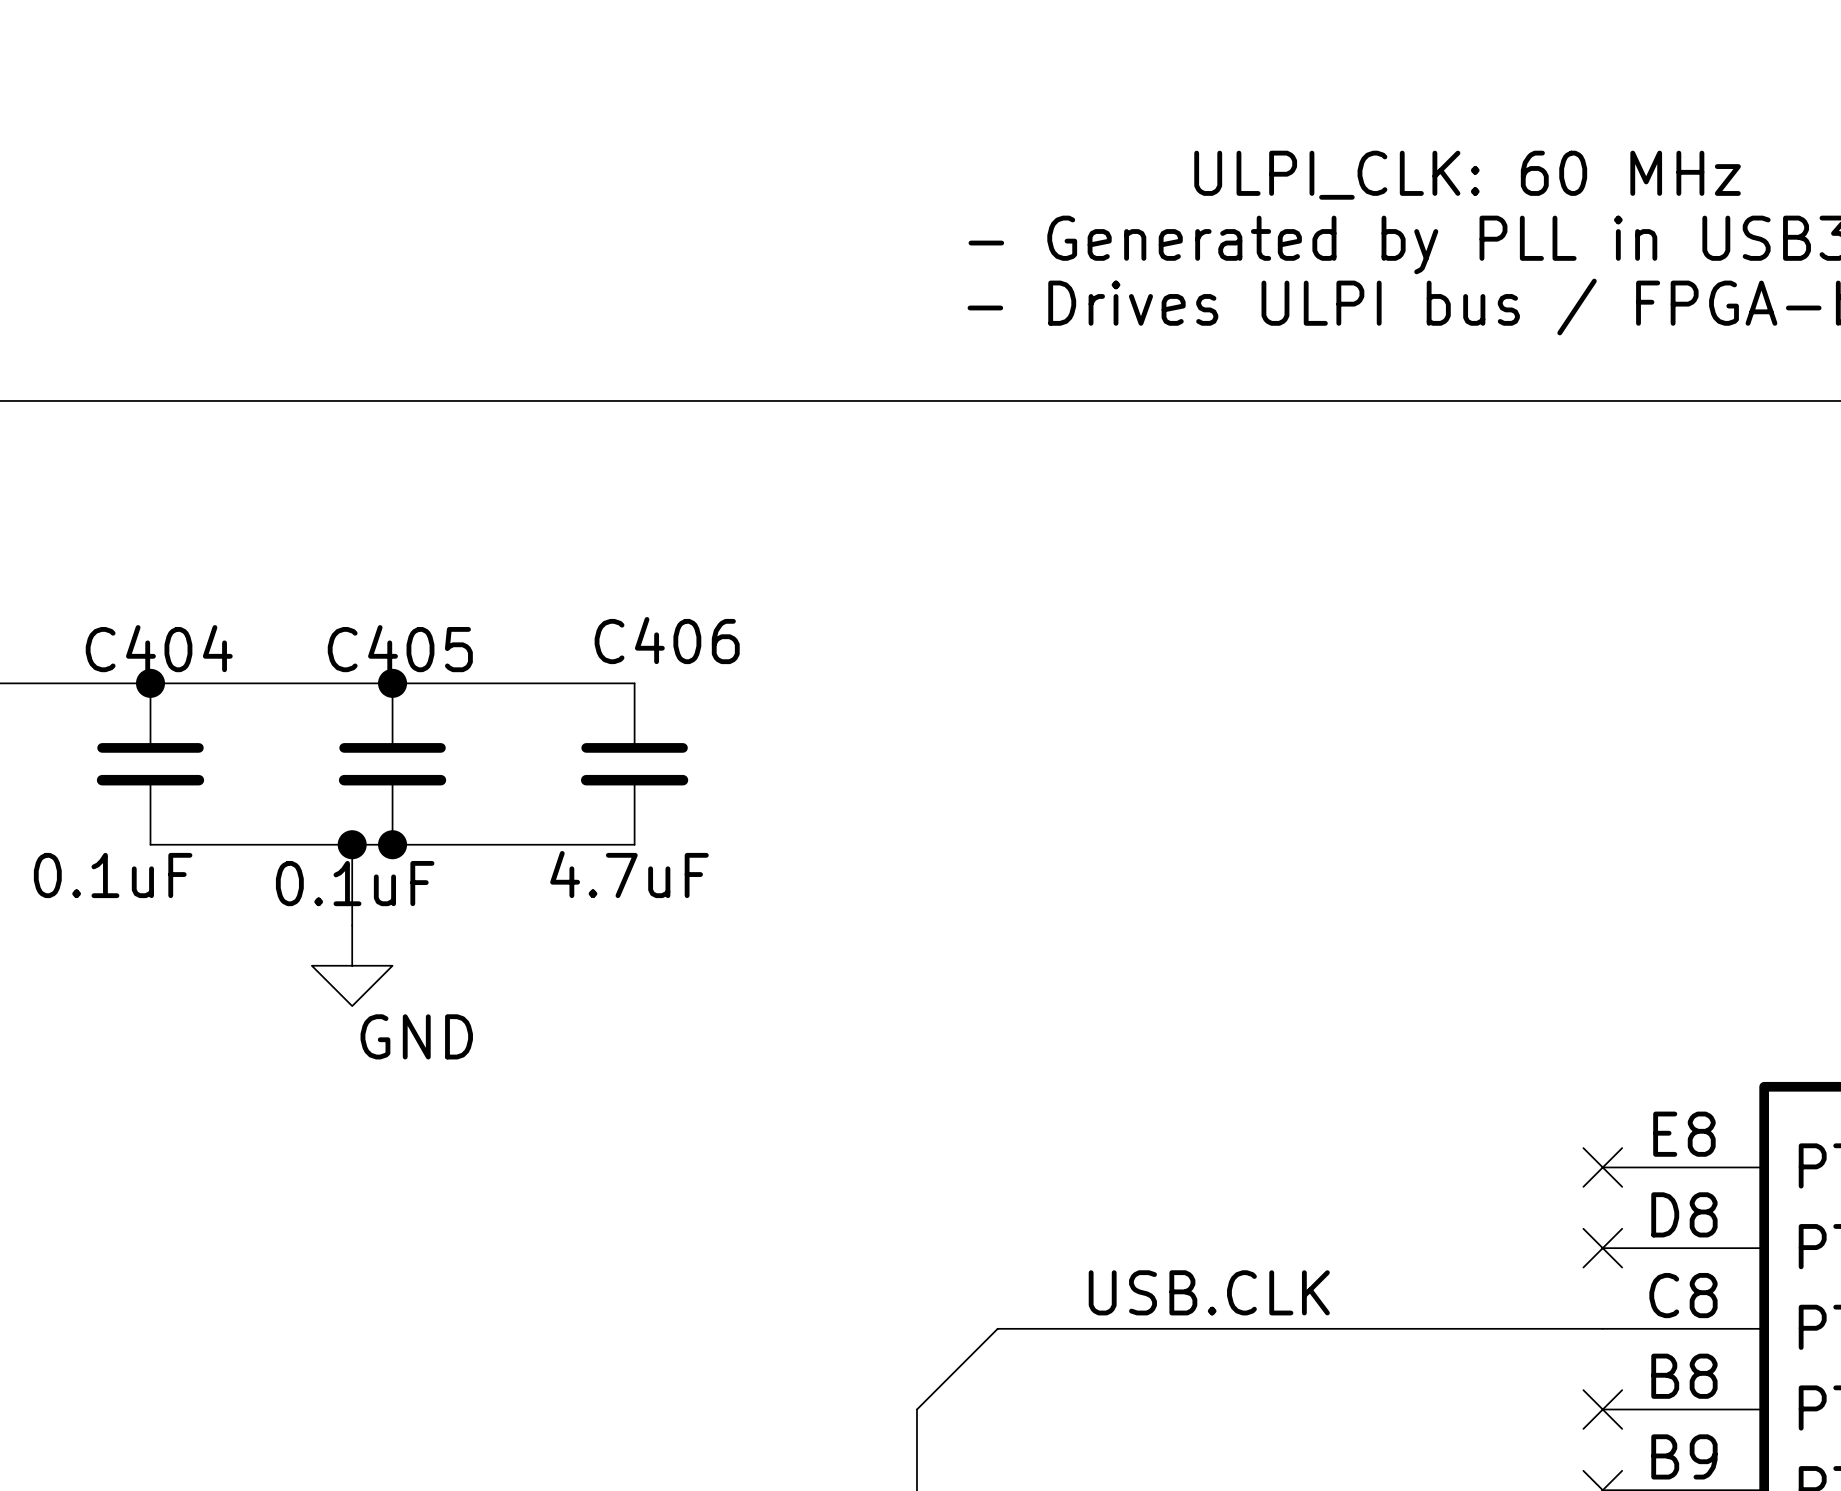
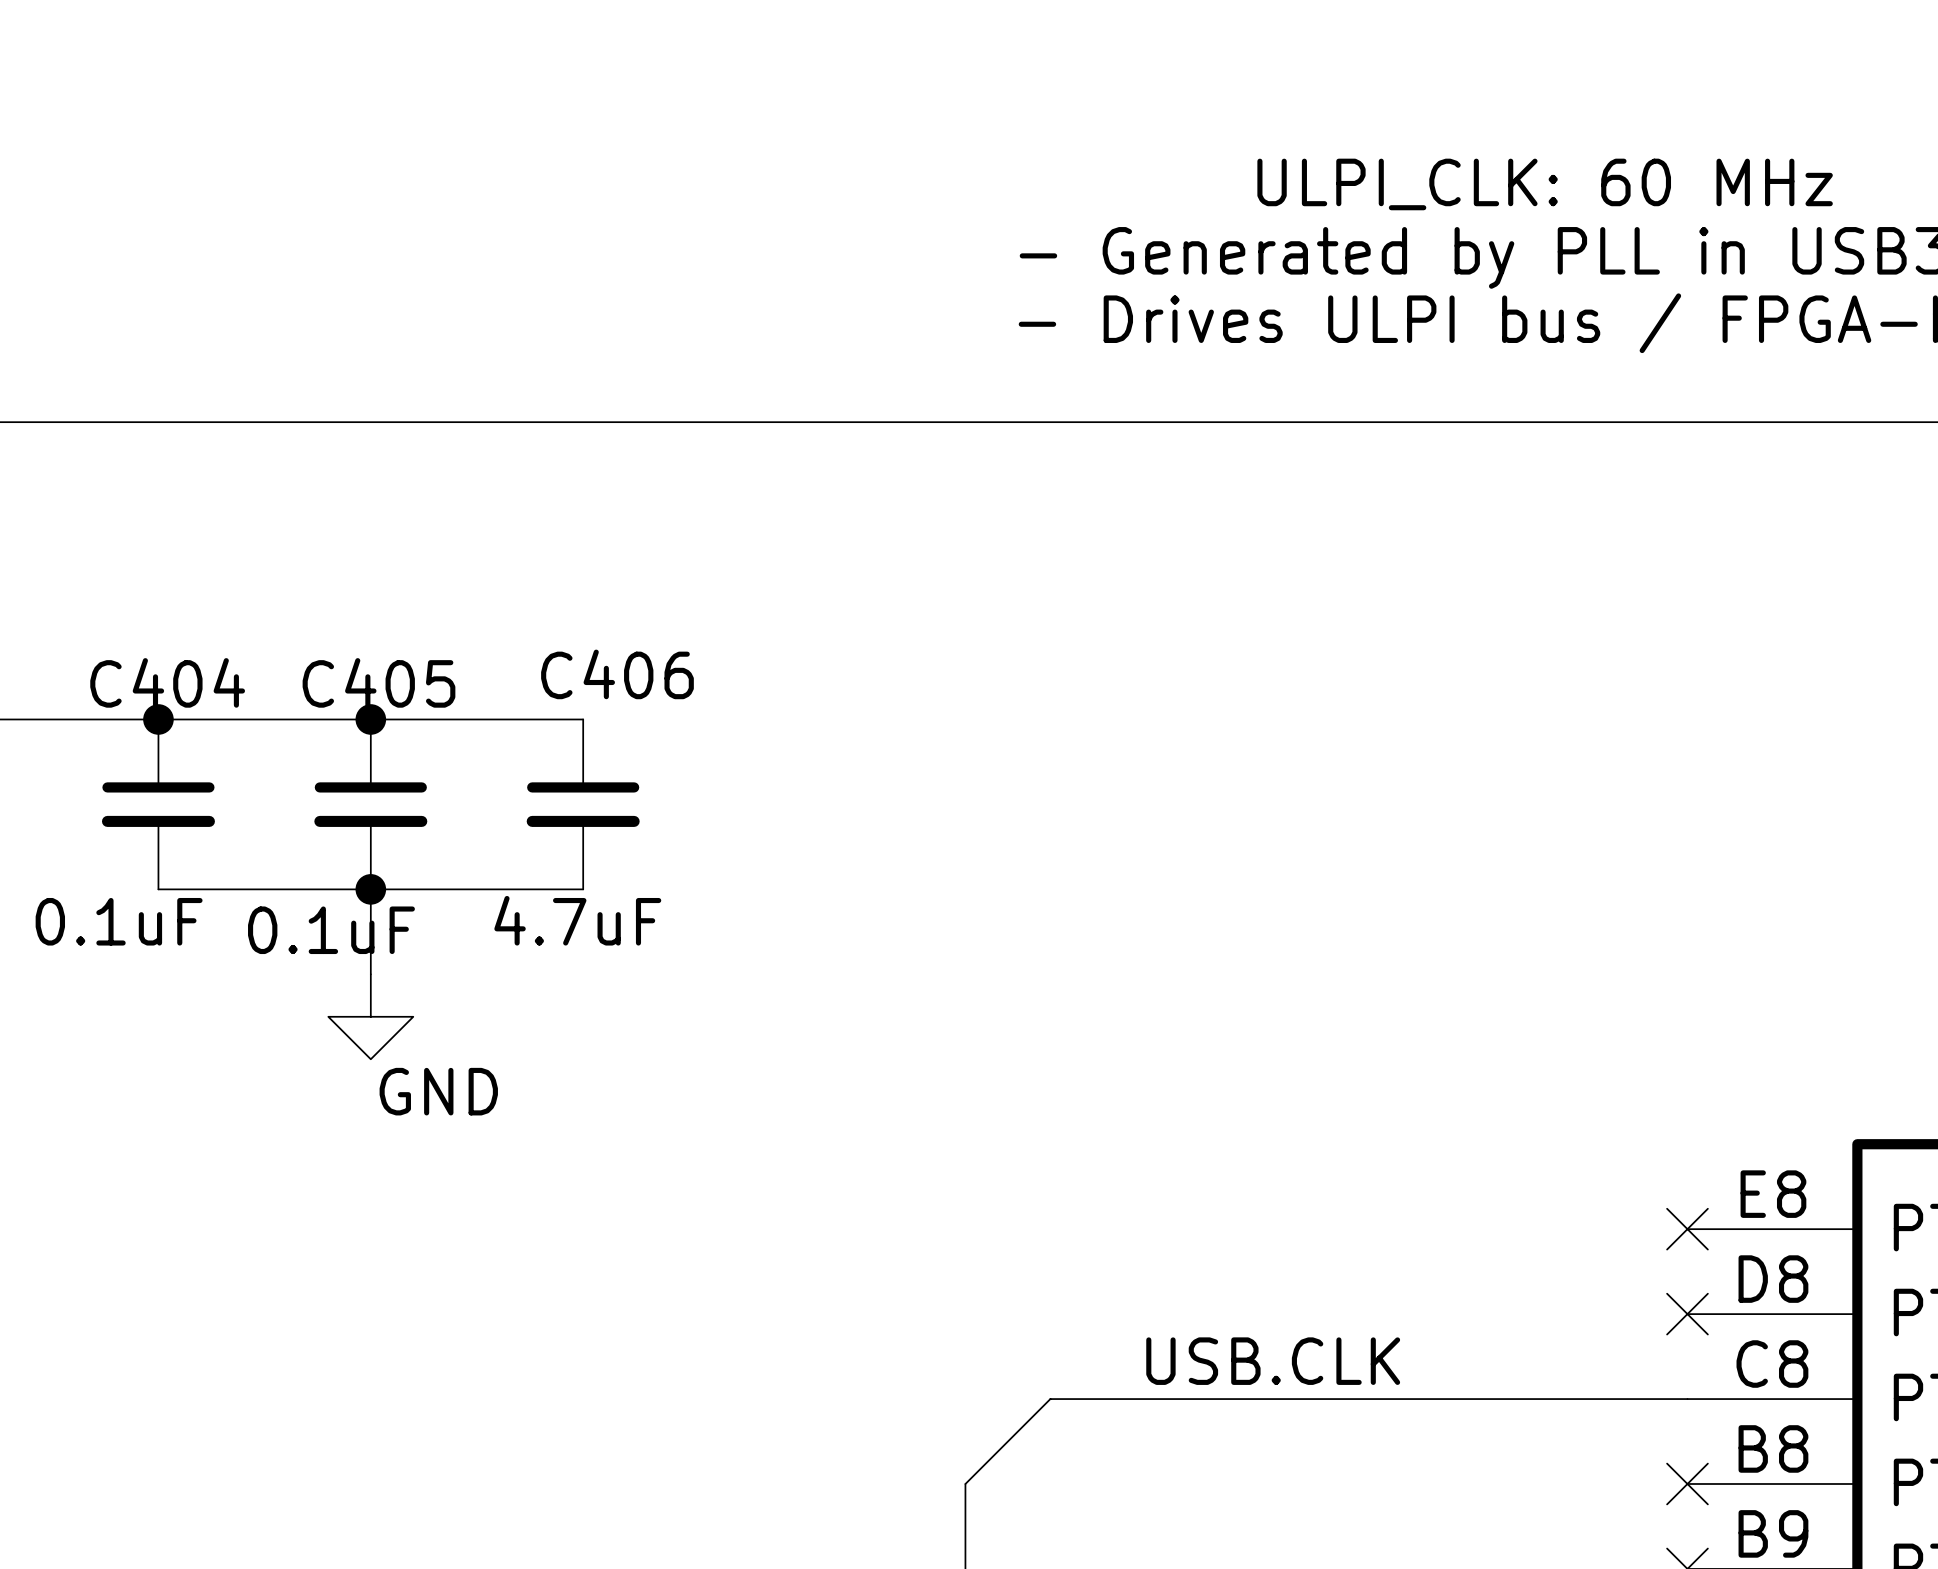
junction position: (392, 683) -> (370, 719)
wire: (553, 683) (634, 683) -> none
C405 position: (392, 764) -> (370, 804)
C406 position: (634, 764) -> (583, 804)
junction: (392, 844) -> none
wire: (553, 844) (634, 844) -> none

